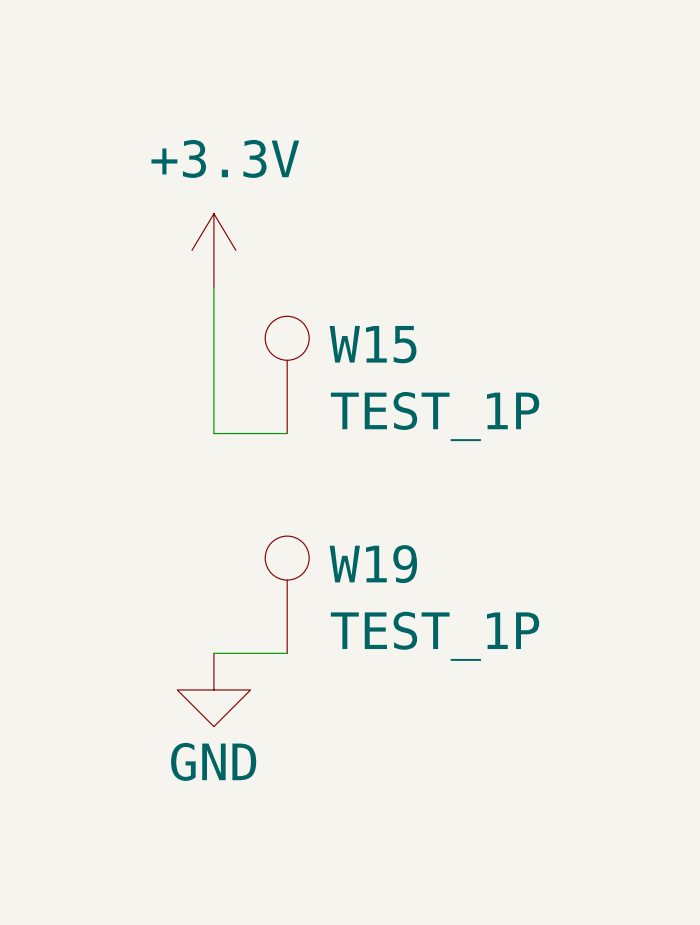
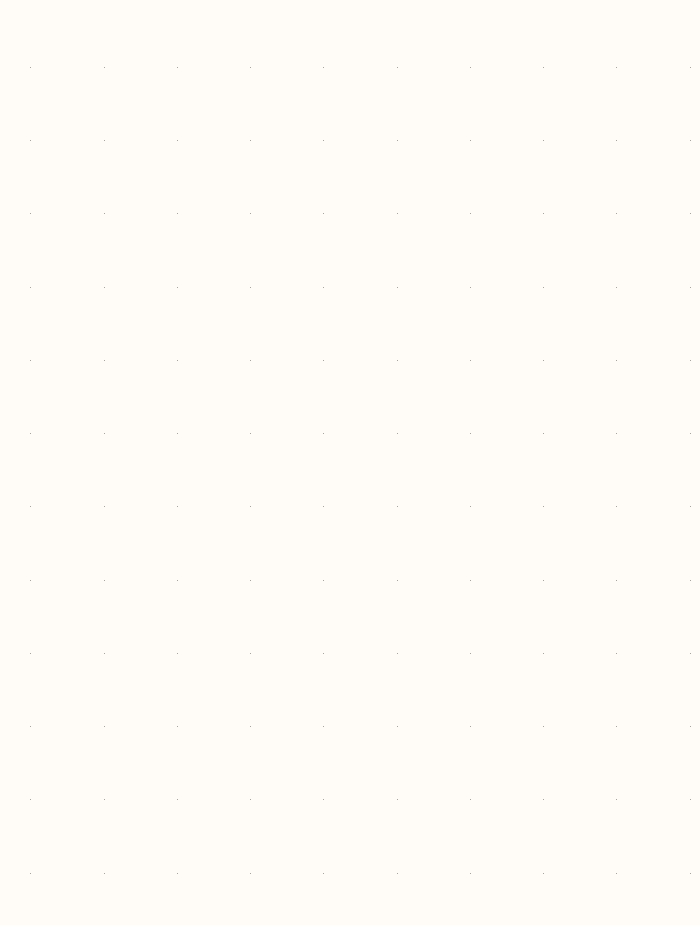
power symbol: +3.3V (213, 250) -> none
wire: (213, 287) (213, 433) (287, 433) -> none
W15: TEST_1P (287, 374) -> none
W19: TEST_1P (287, 594) -> none
wire: (213, 653) (287, 653) -> none
power symbol: GND (213, 689) -> none

